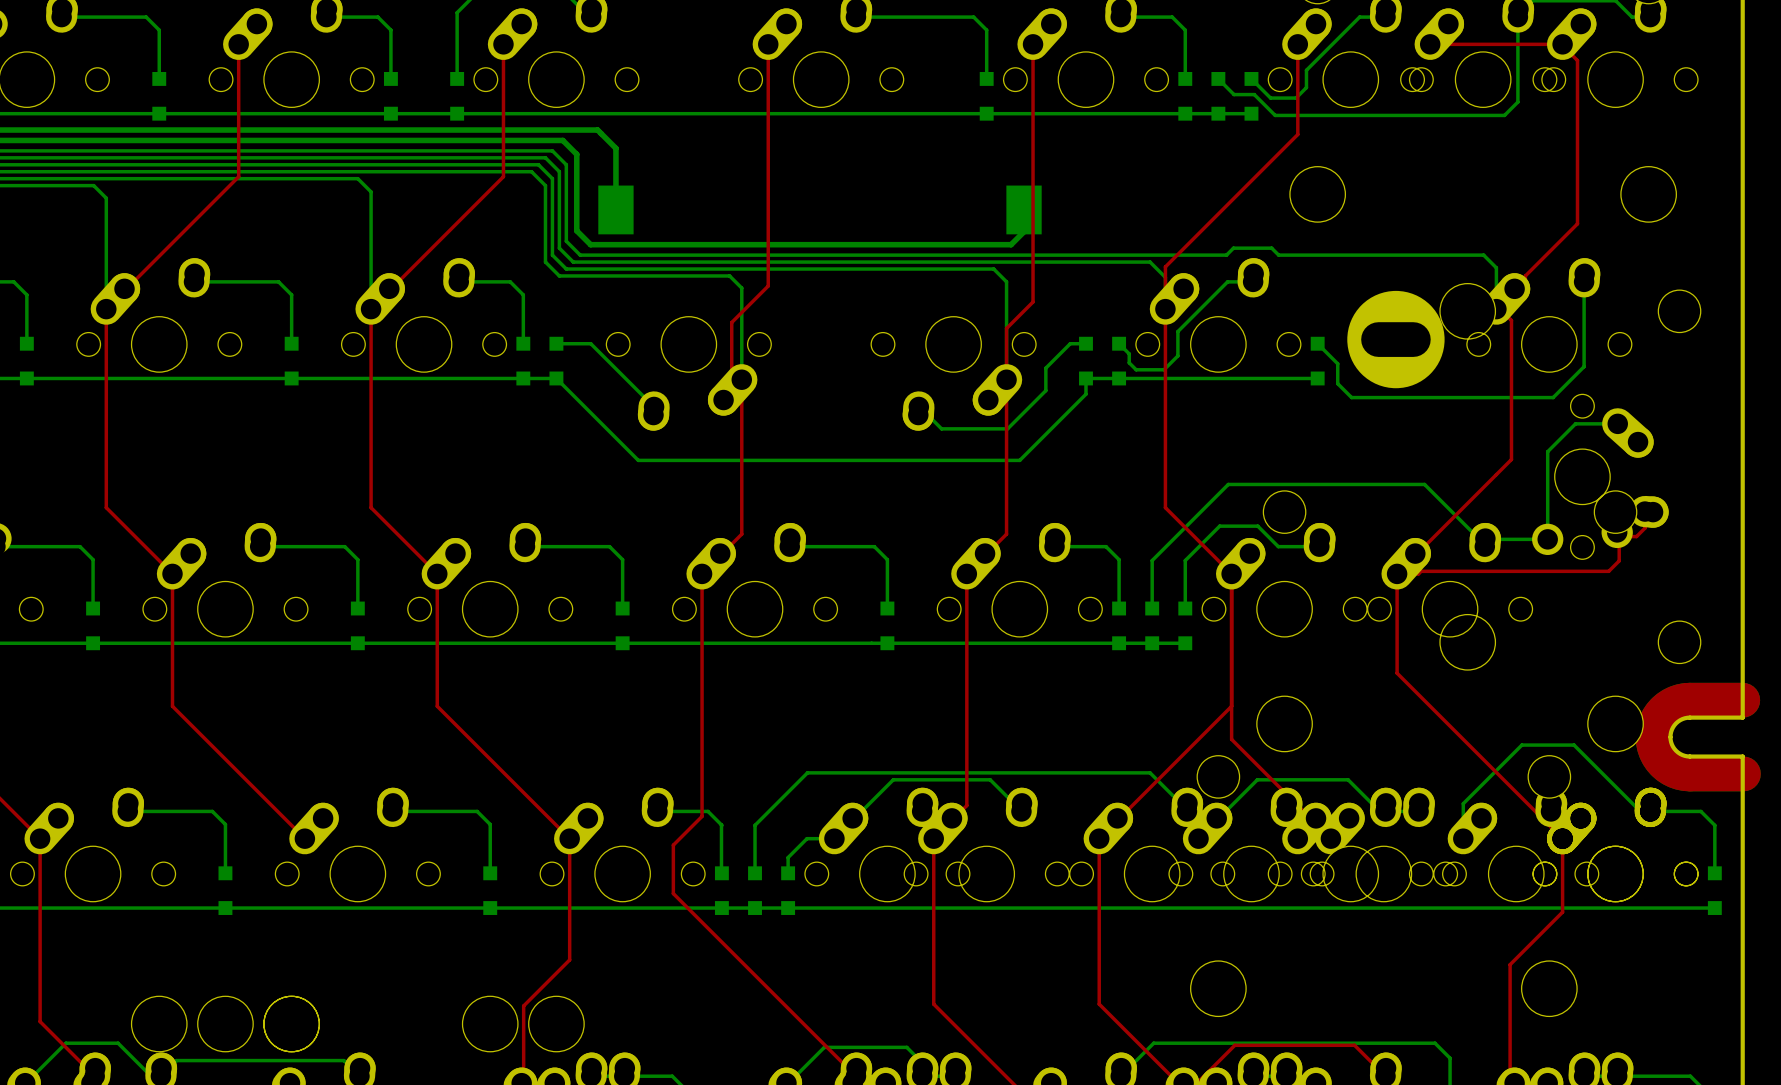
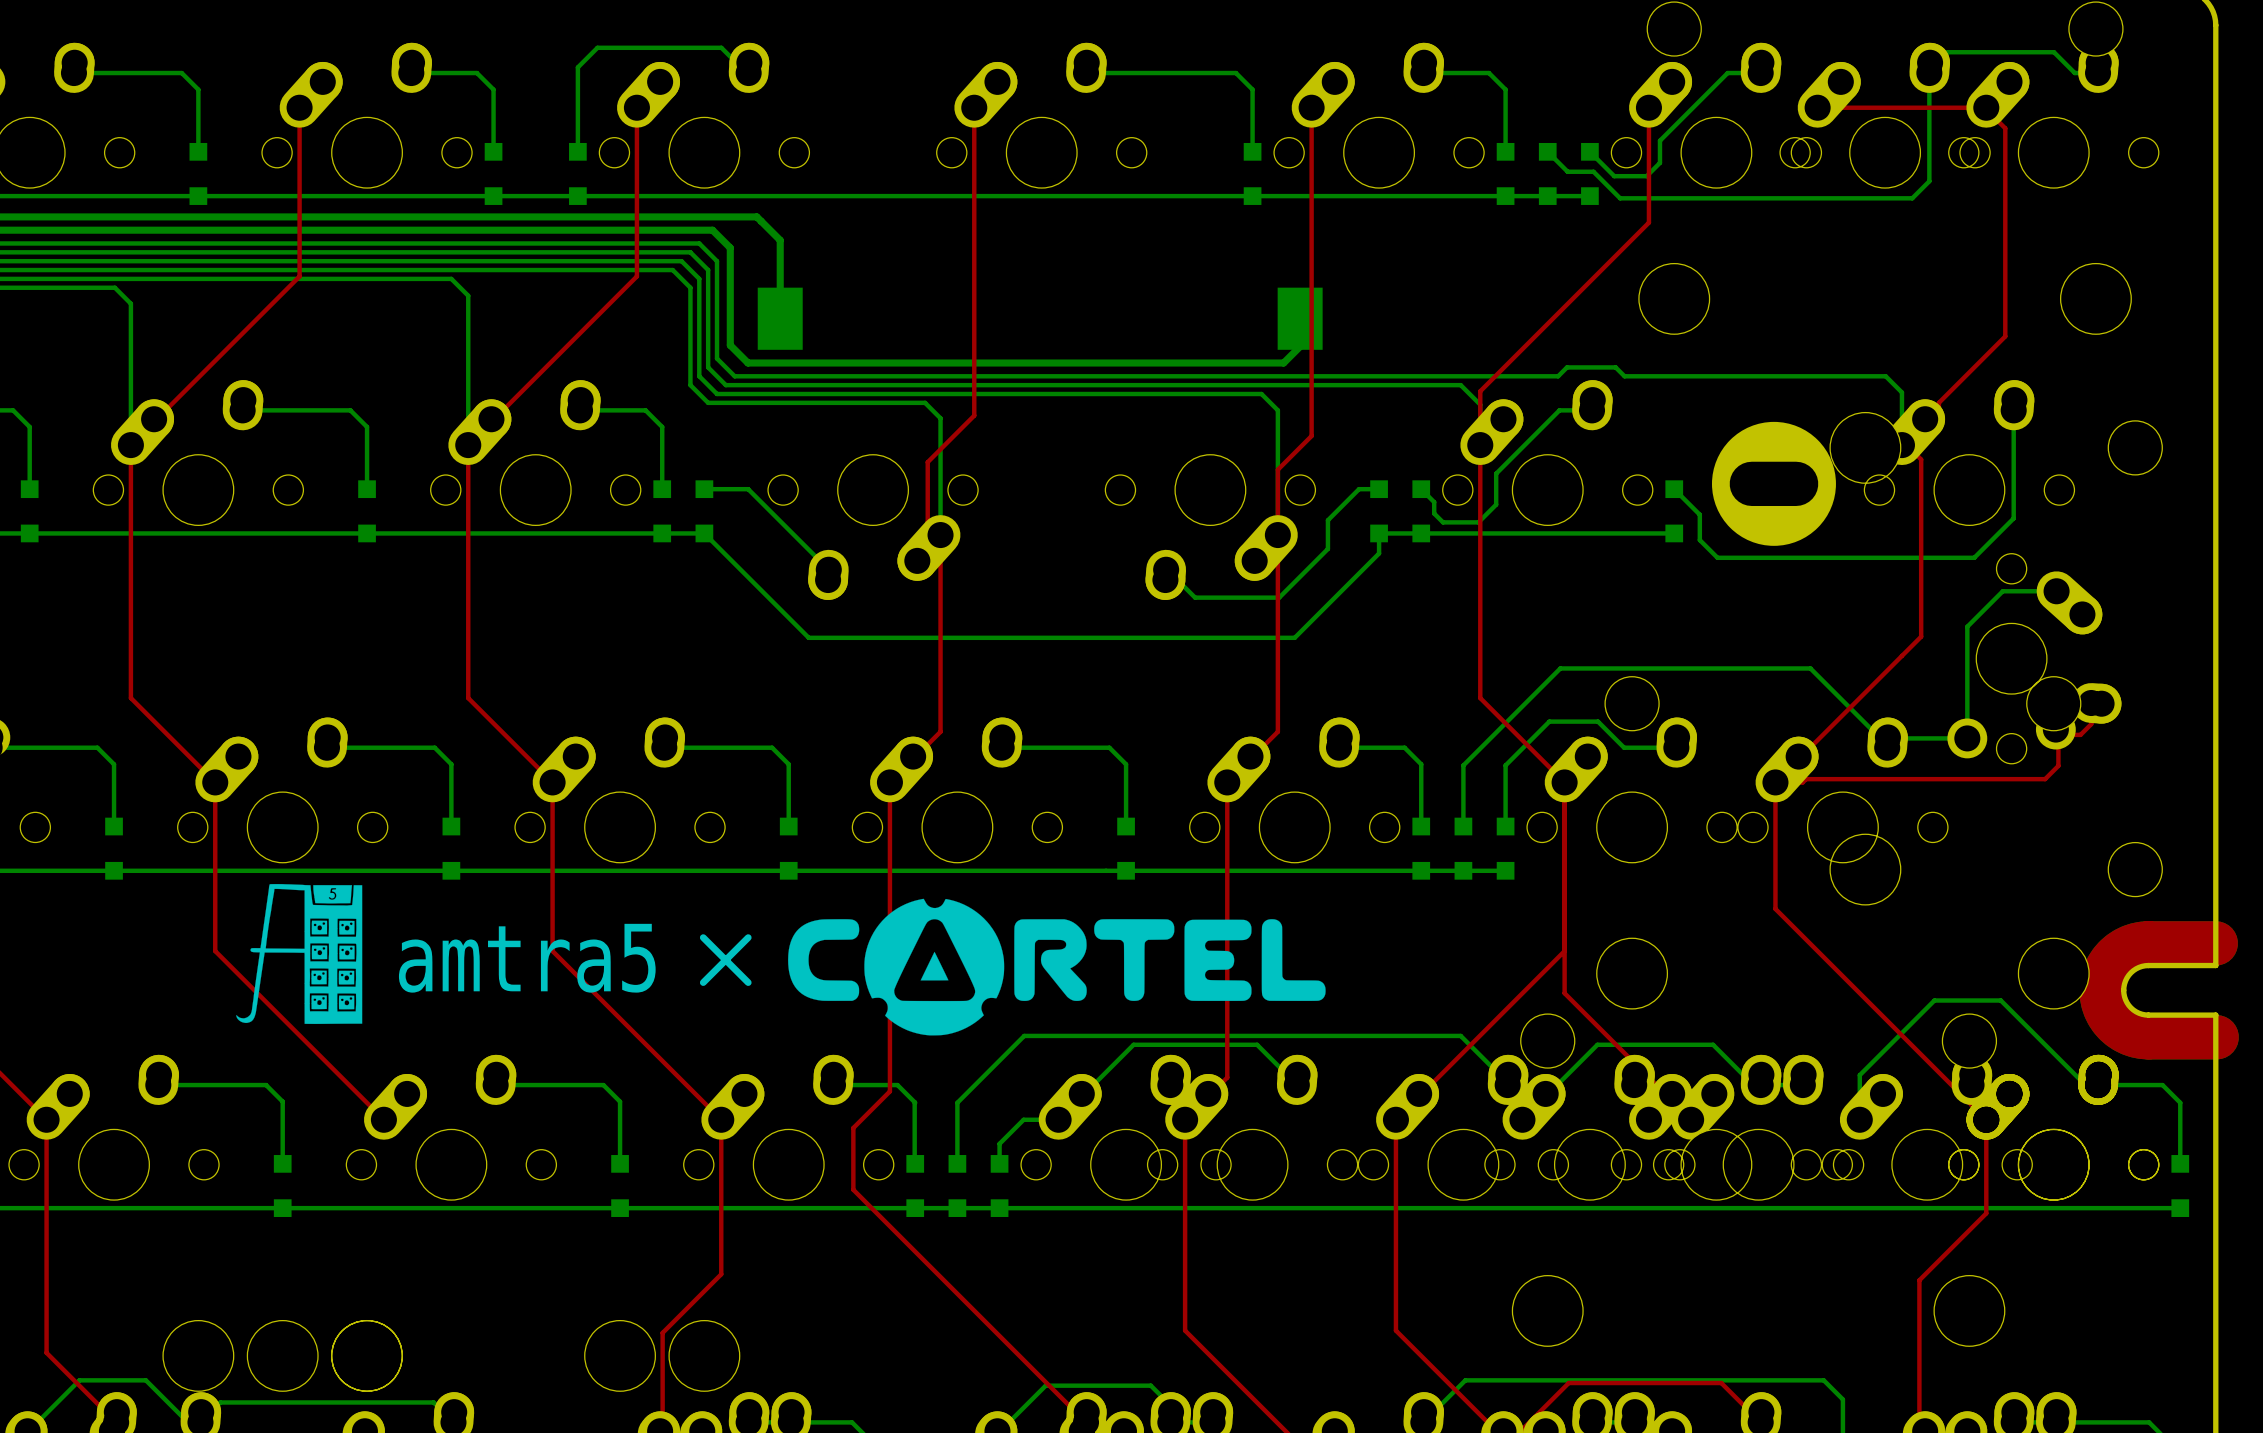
drawing: none -> [236, 884, 363, 1024]
drawing: none -> [788, 898, 1326, 1036]
line: none -> (703, 937) (748, 982)
line: none -> (748, 937) (703, 982)
text: none -> amtra5 (527, 958)

